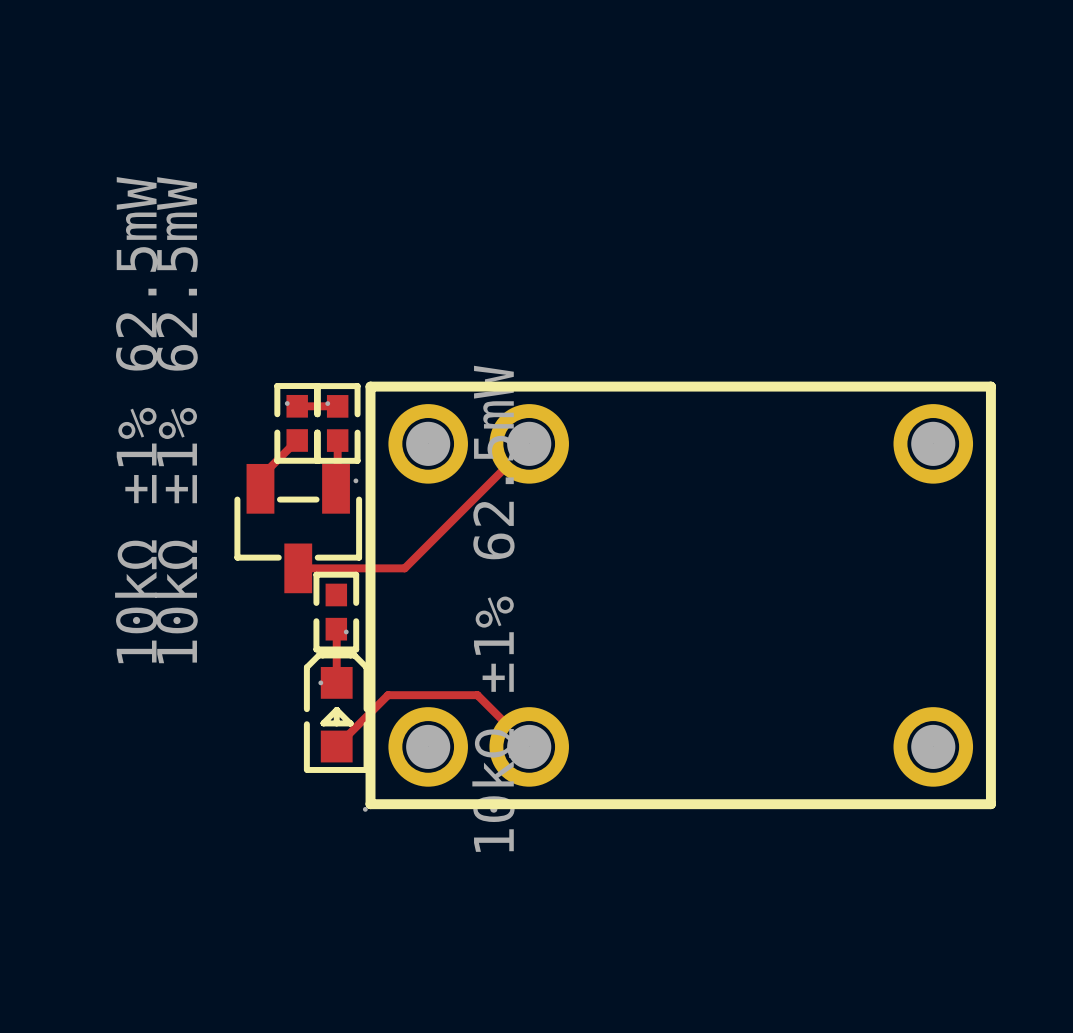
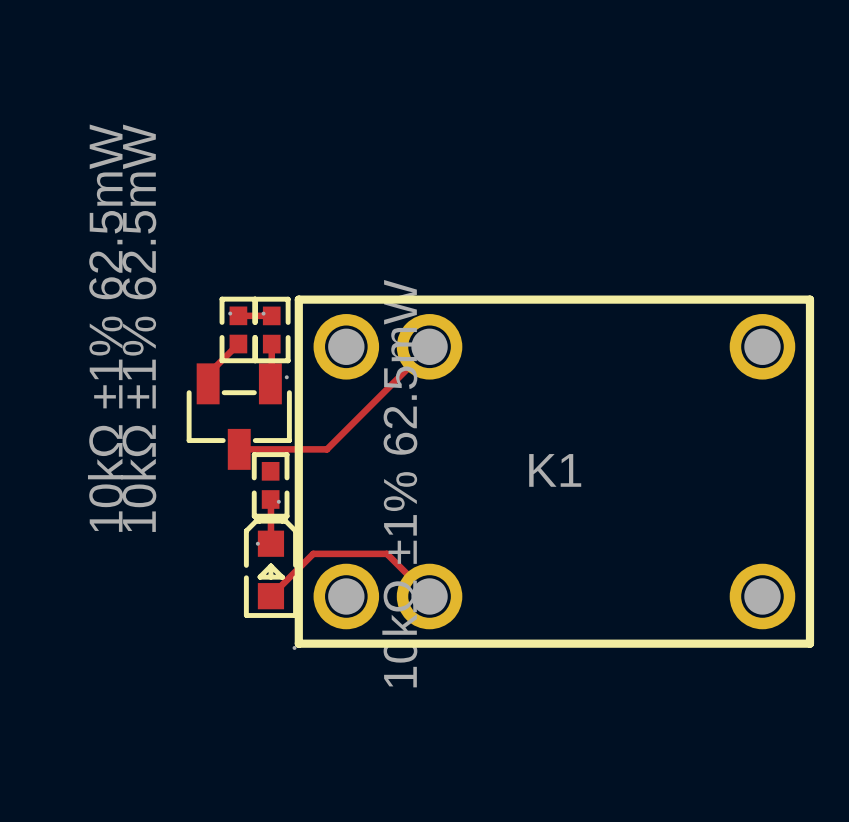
K1 name: none -> K1 (555, 470)

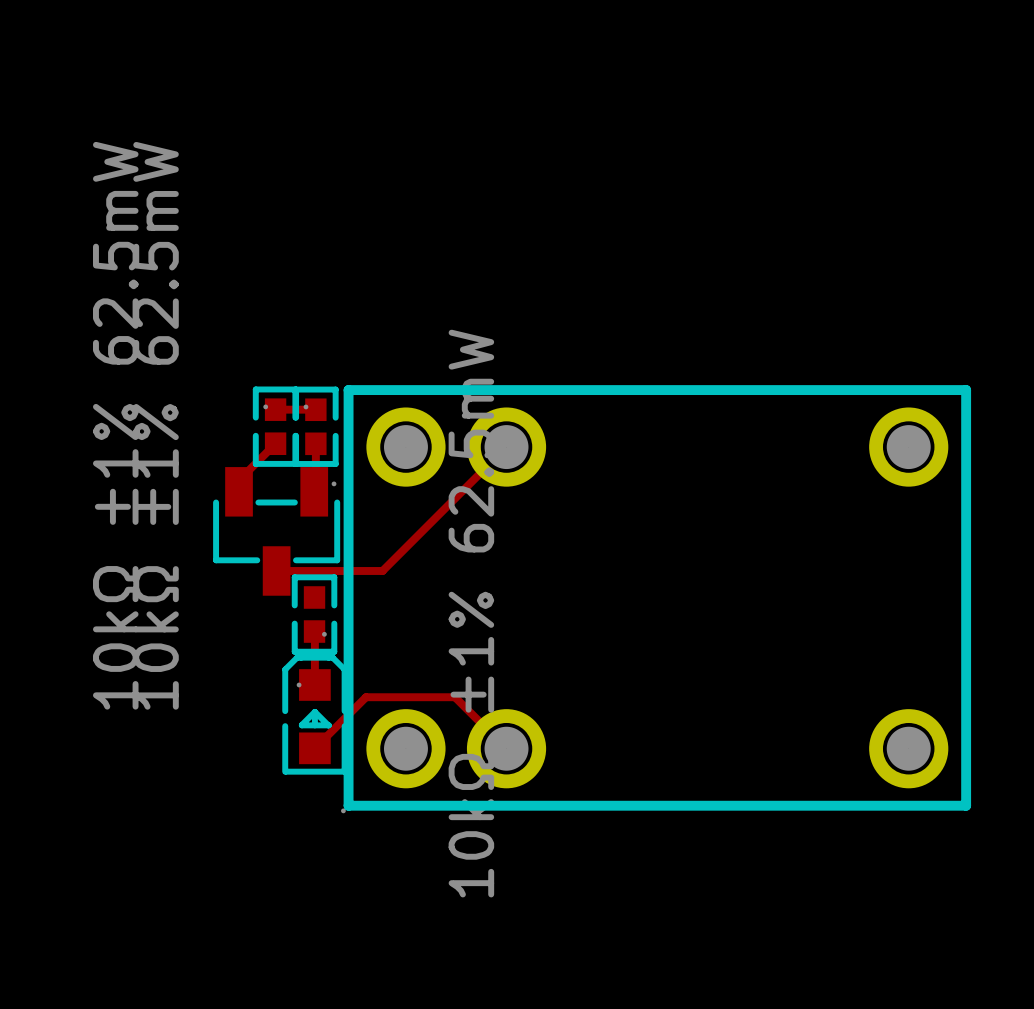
K1 name: K1 (555, 470) -> none

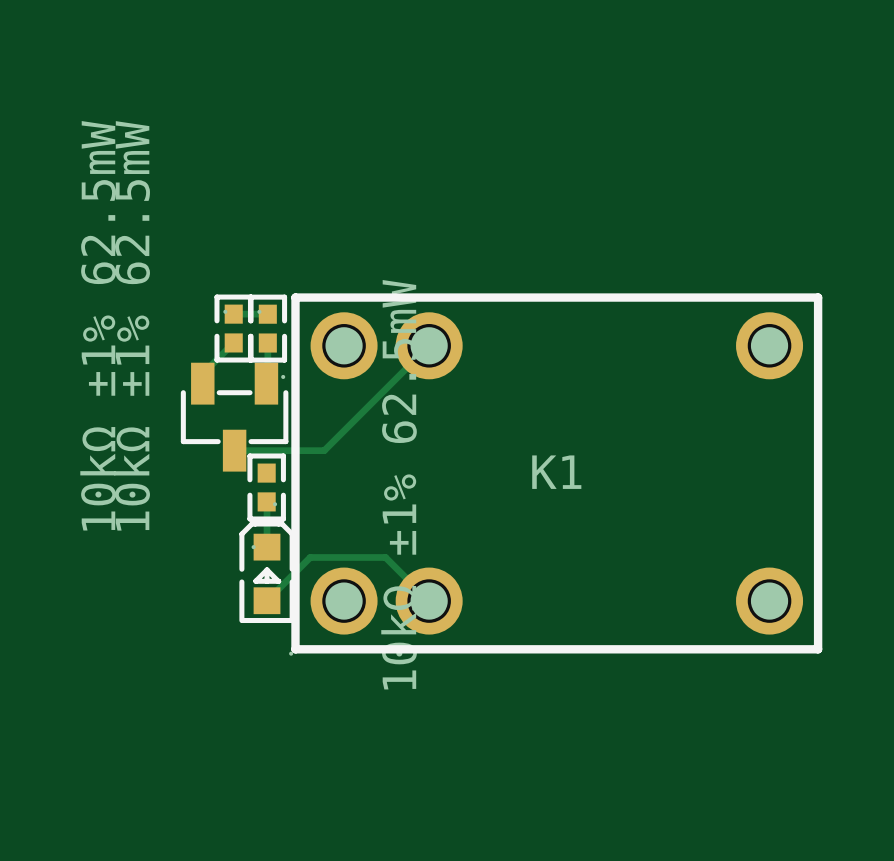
K1 name: none -> K1 (556, 472)

